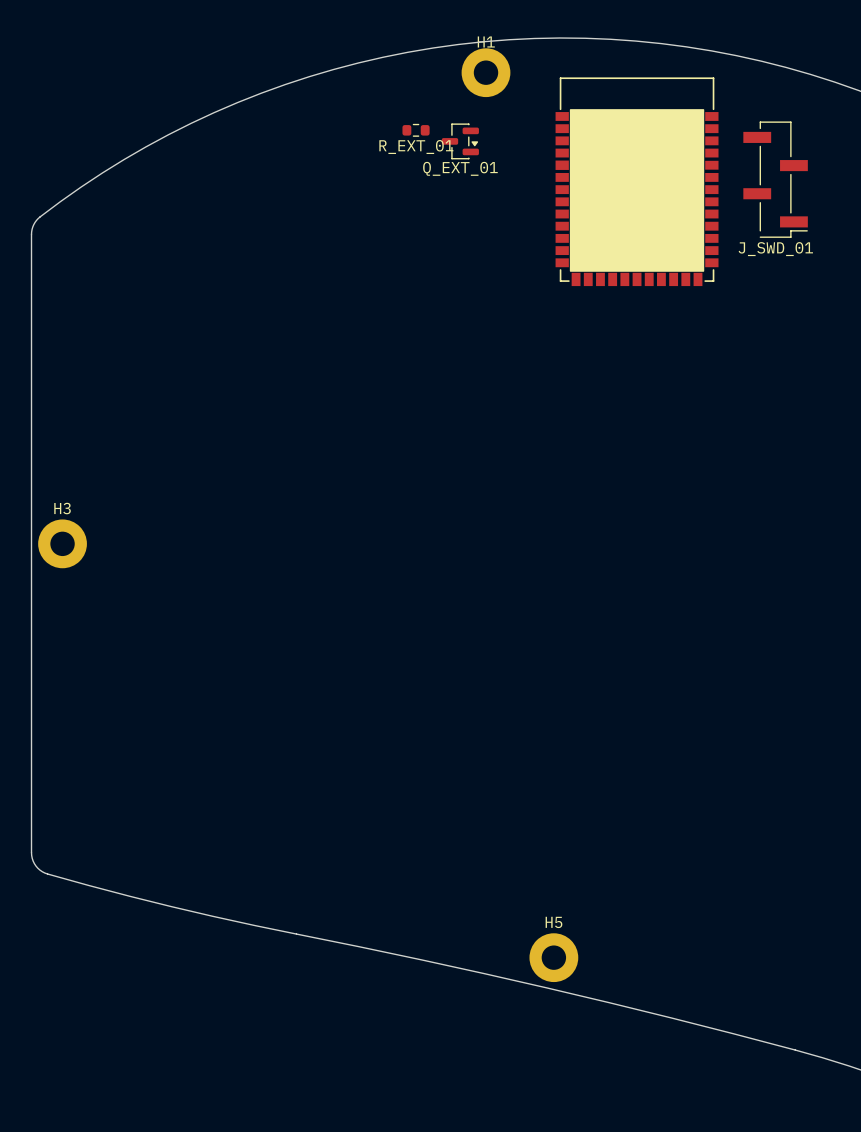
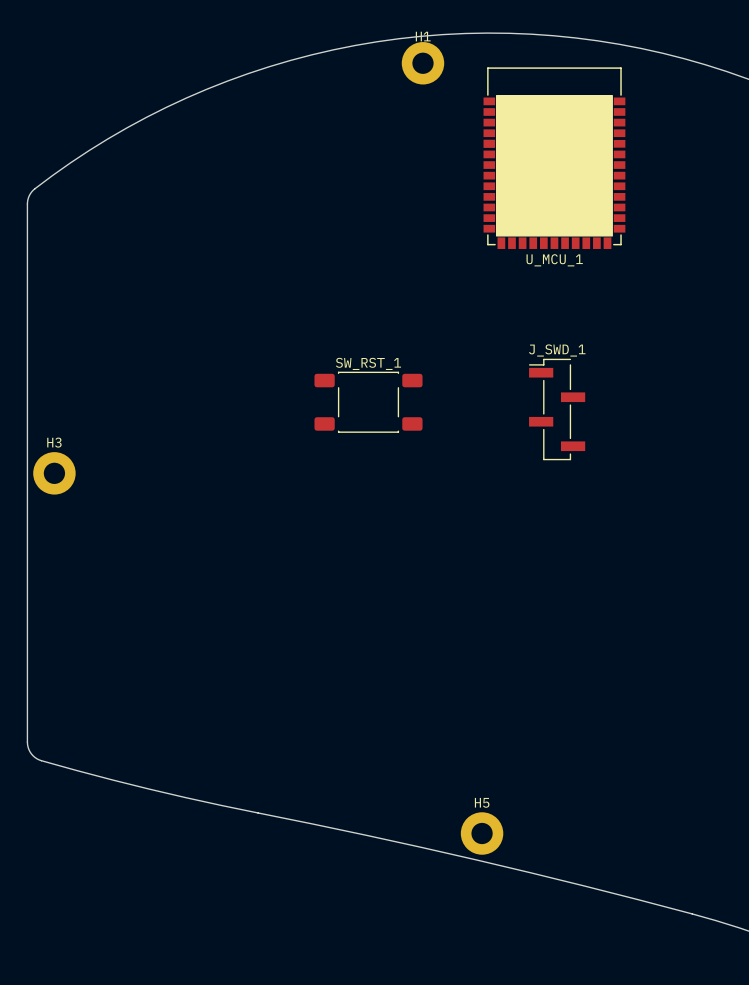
R_EXT_01: (416, 130) -> none
Q_EXT_01: (460, 141) -> none
J_SWD_01: (775, 179) -> none
U_MCU_1 name: none -> U_MCU_1 (554, 260)
SW_RST_1: none -> (368, 402)
J_SWD_1: none -> (557, 409)

